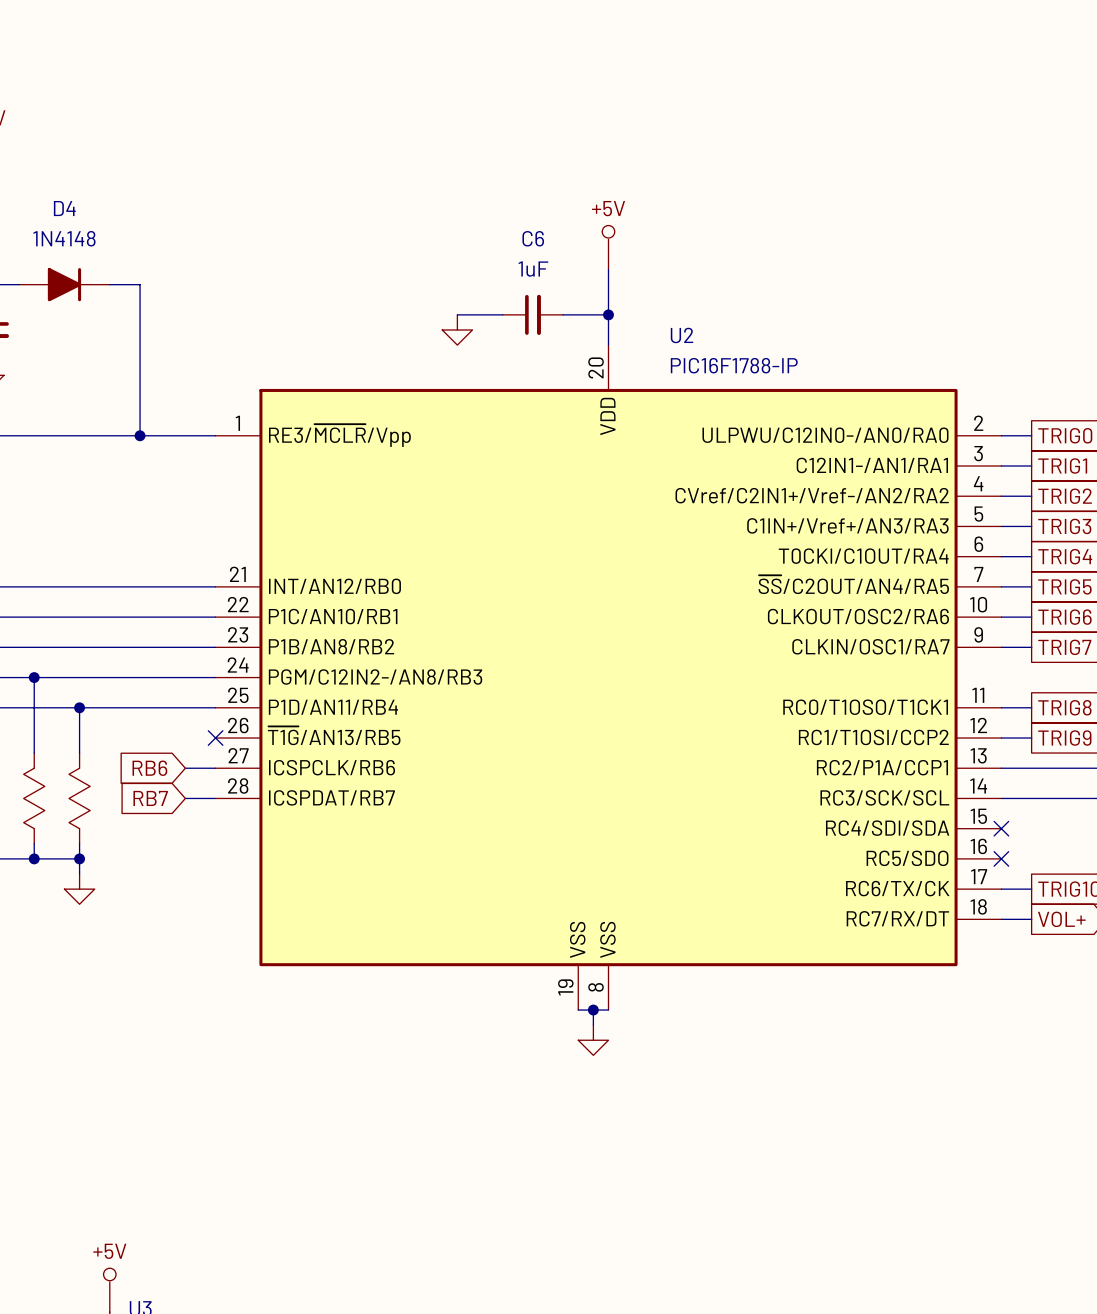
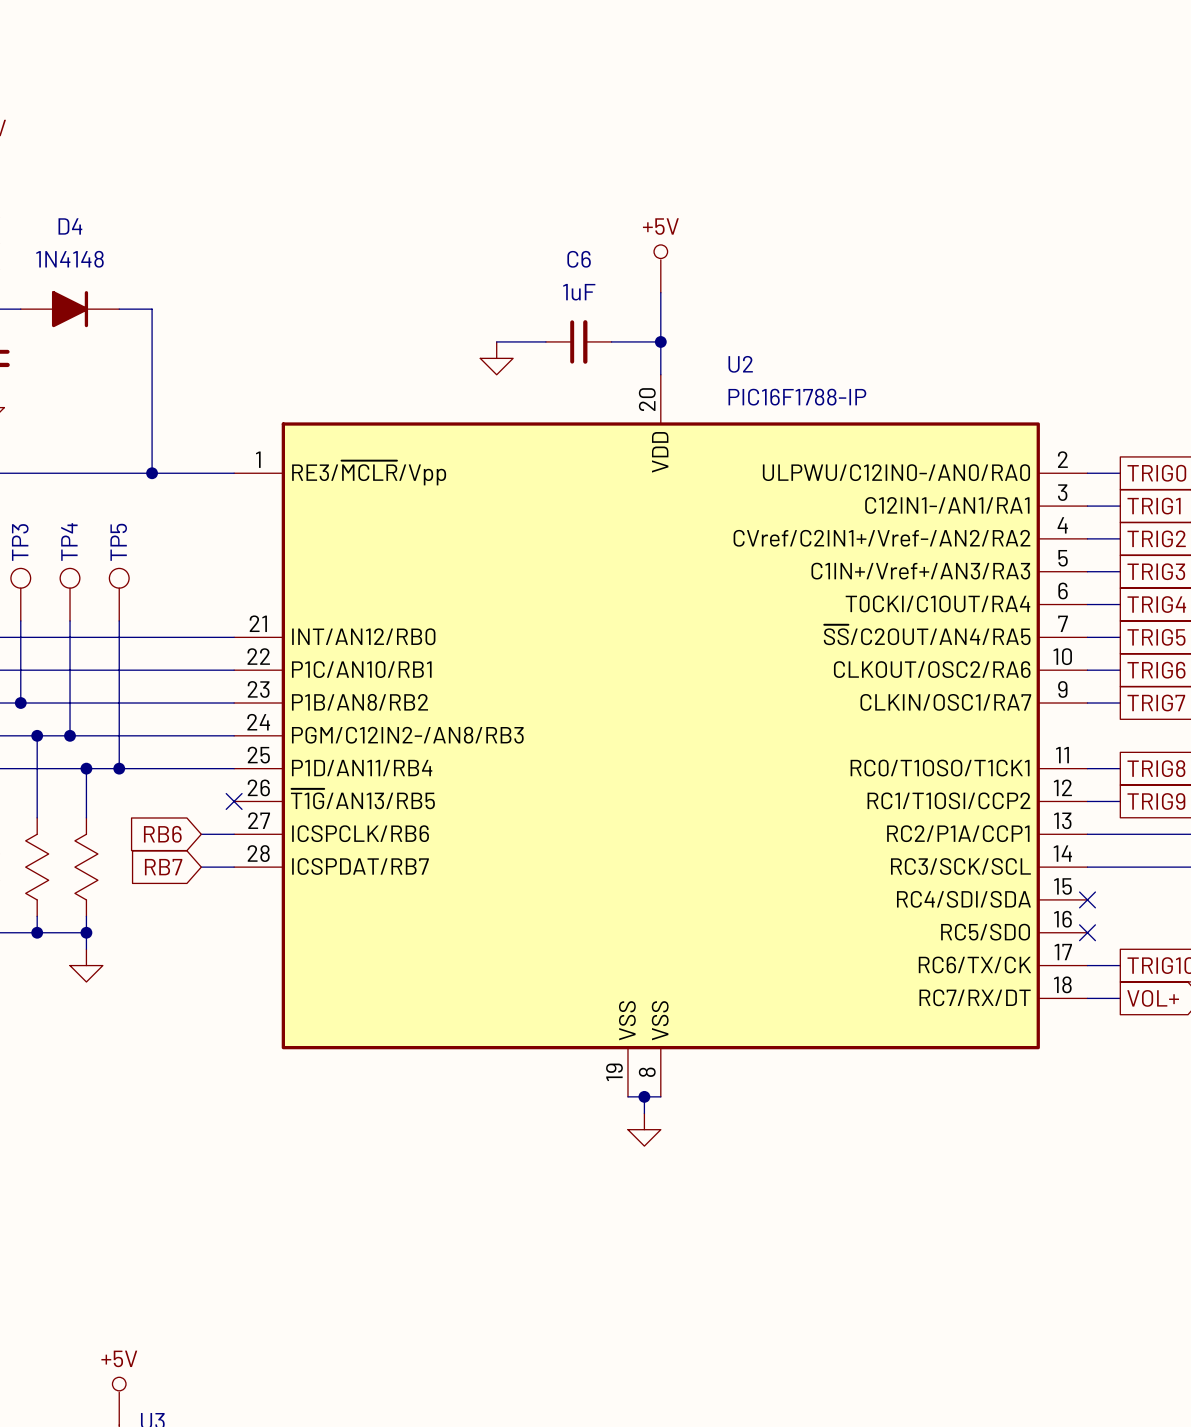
TP3: none -> (20, 594)
TP4: none -> (70, 594)
TP5: none -> (119, 594)
wire: none -> (20, 620) (20, 703)
wire: none -> (70, 620) (70, 735)
wire: none -> (119, 620) (119, 768)
junction: none -> (20, 703)
junction: none -> (70, 735)
junction: none -> (119, 768)

